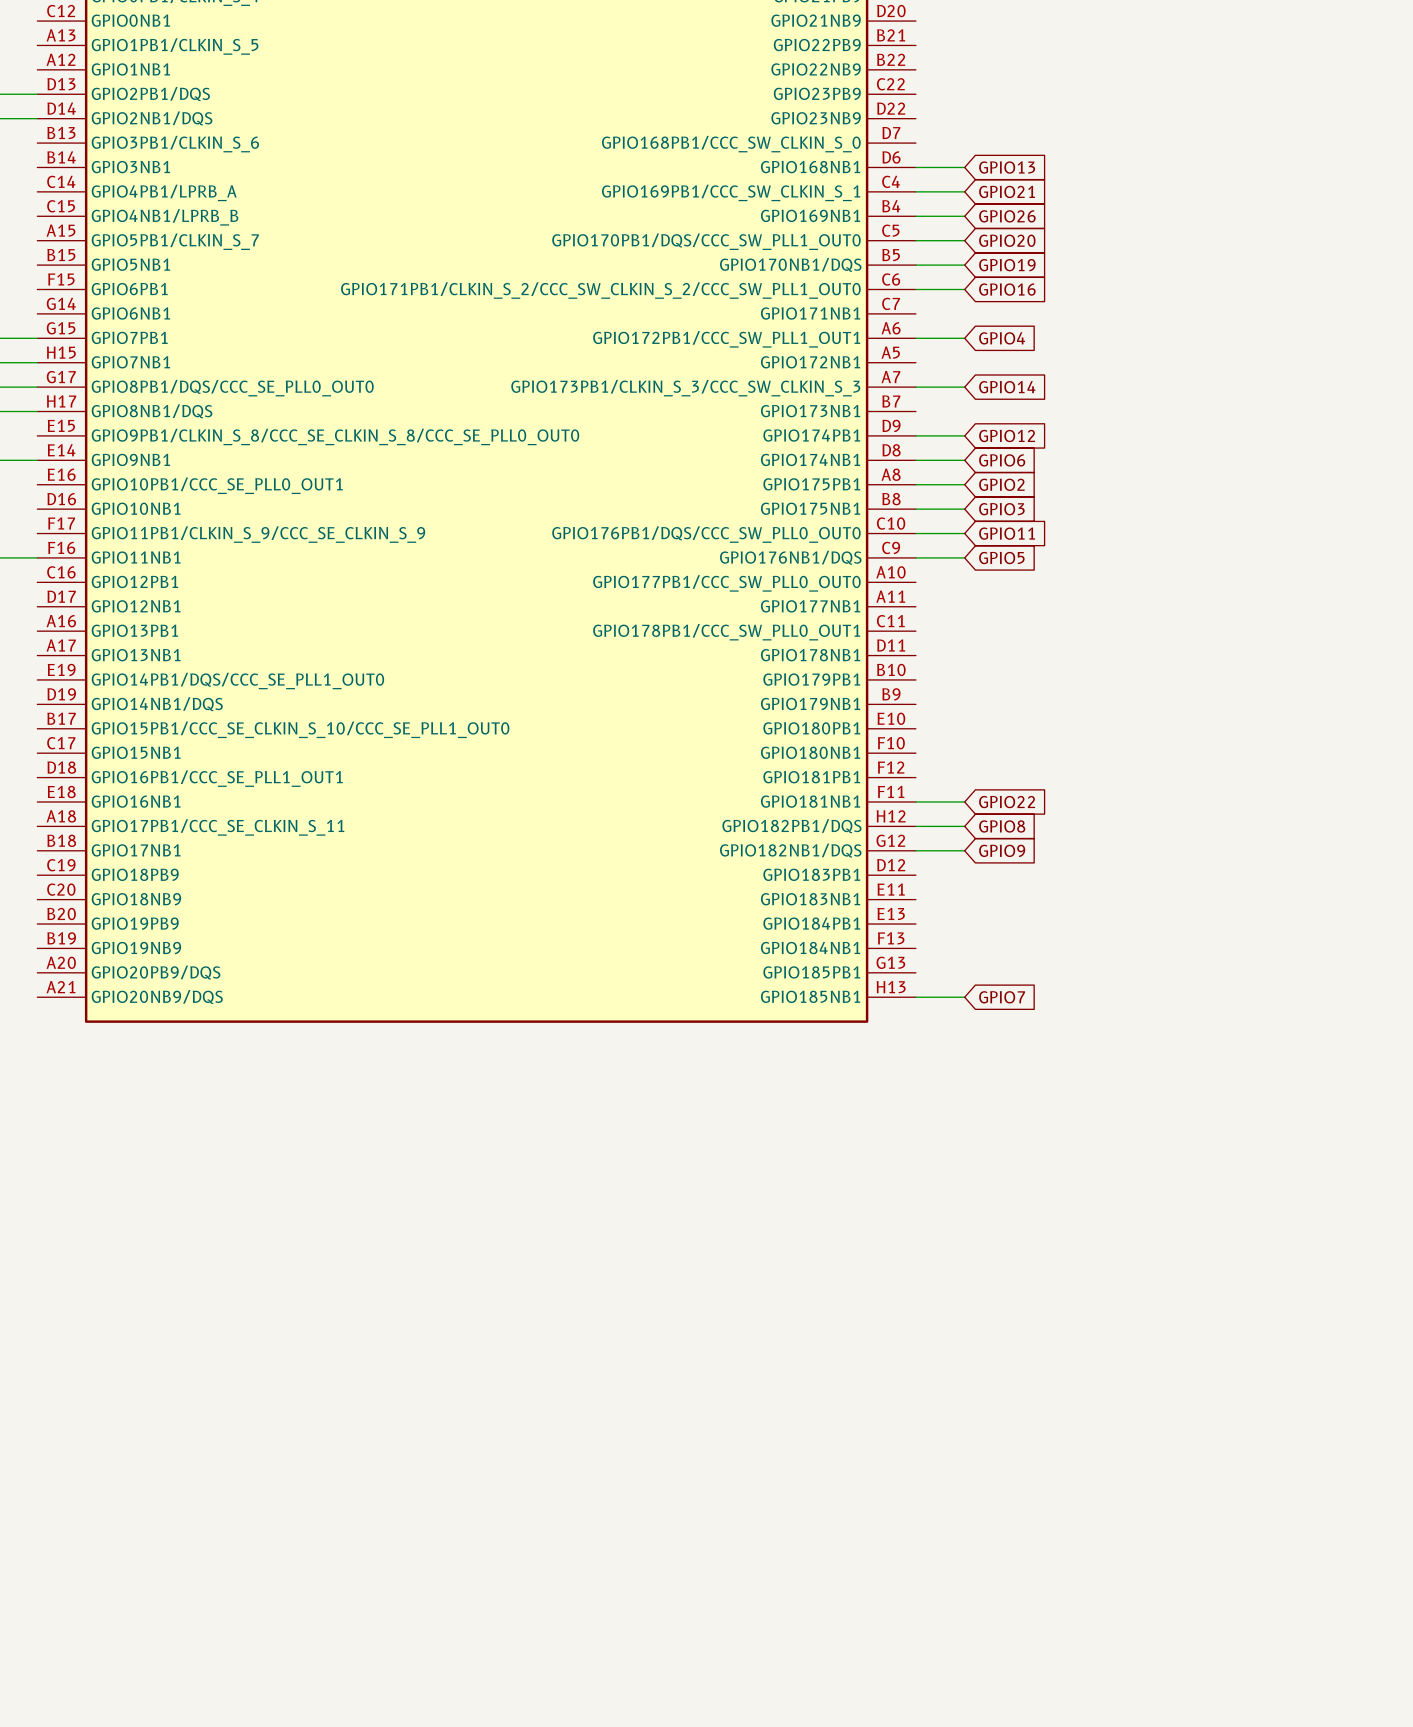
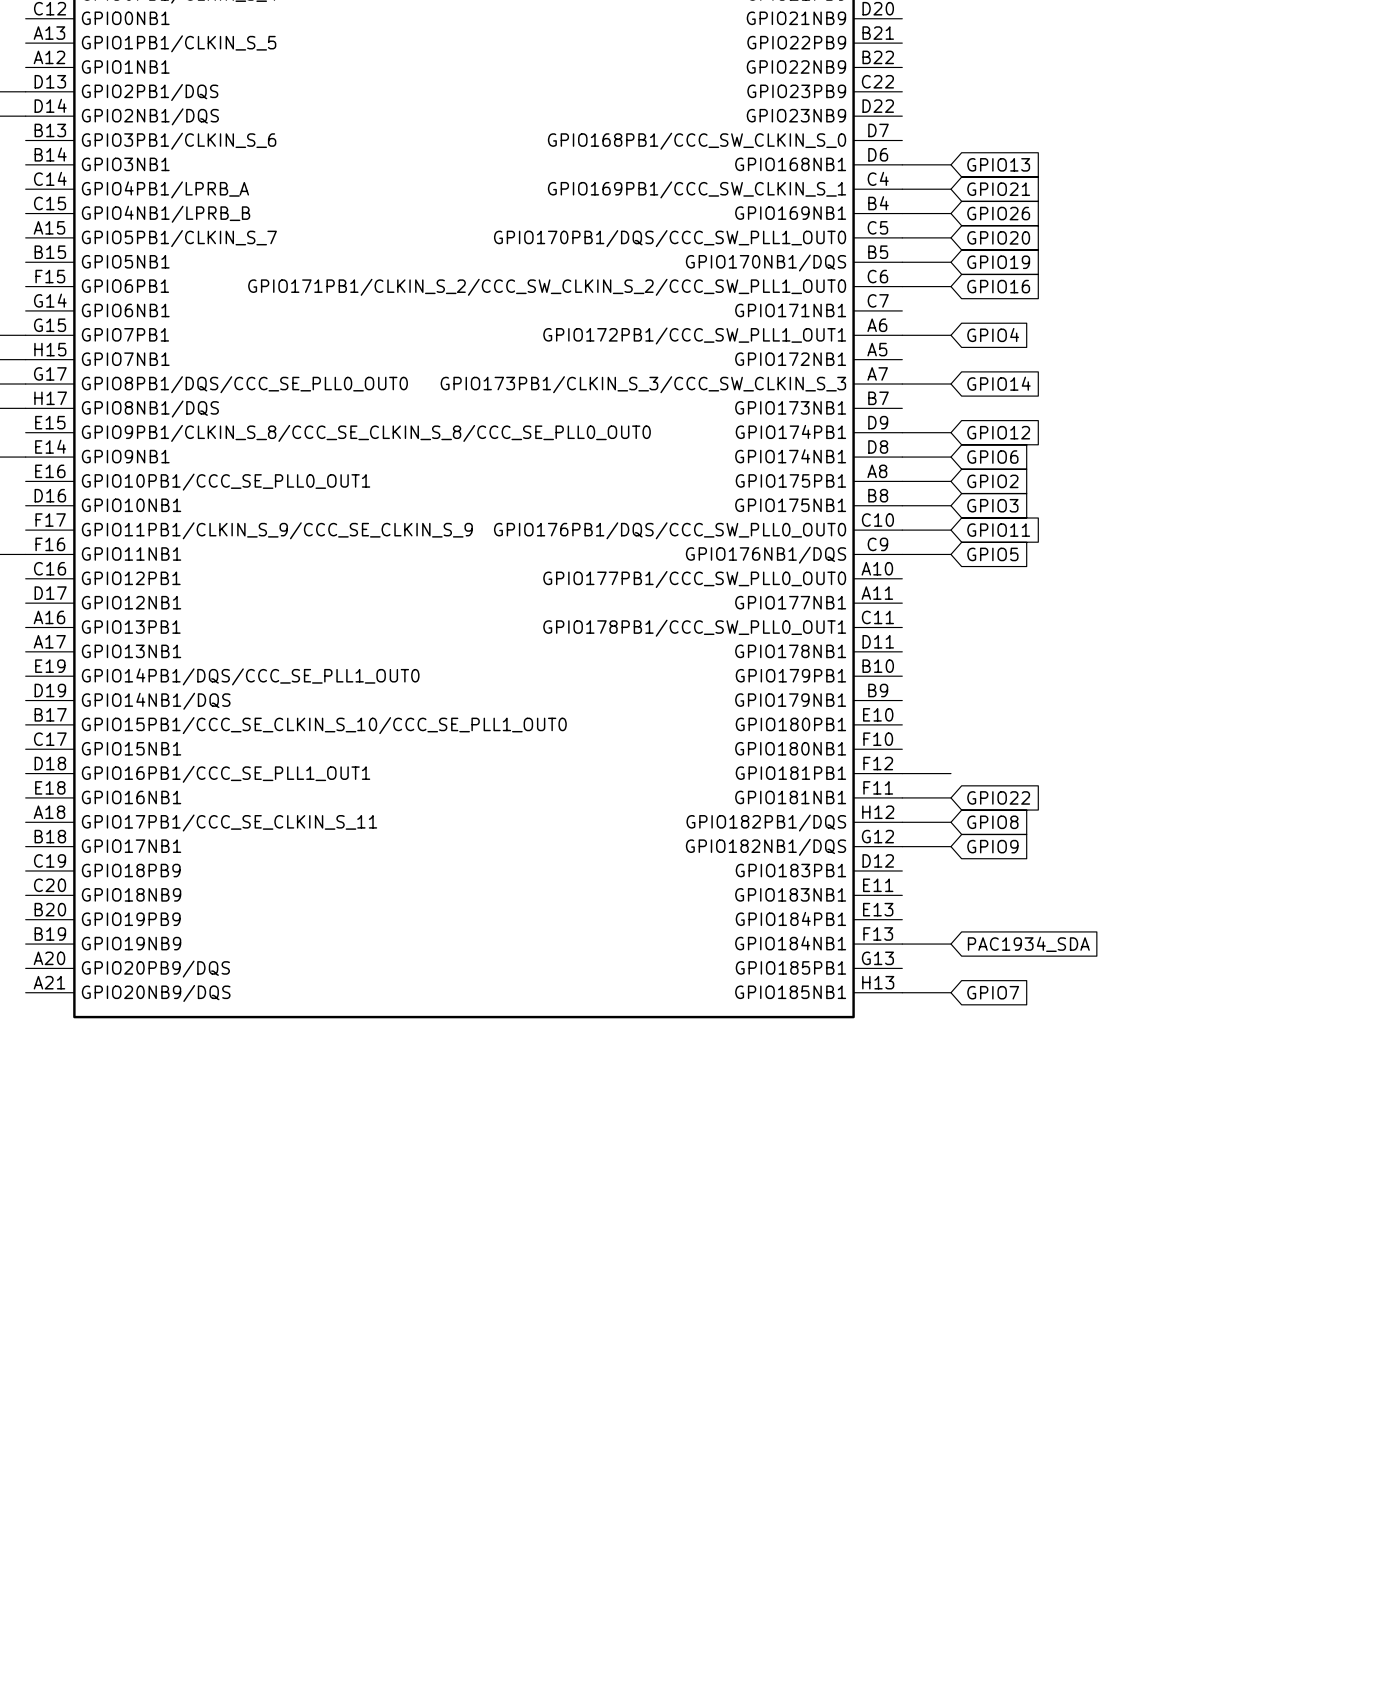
wire: none -> (902, 773) (950, 773)
wire: none -> (902, 944) (950, 944)
global label: none -> PAC1934_SDA (1028, 944)

